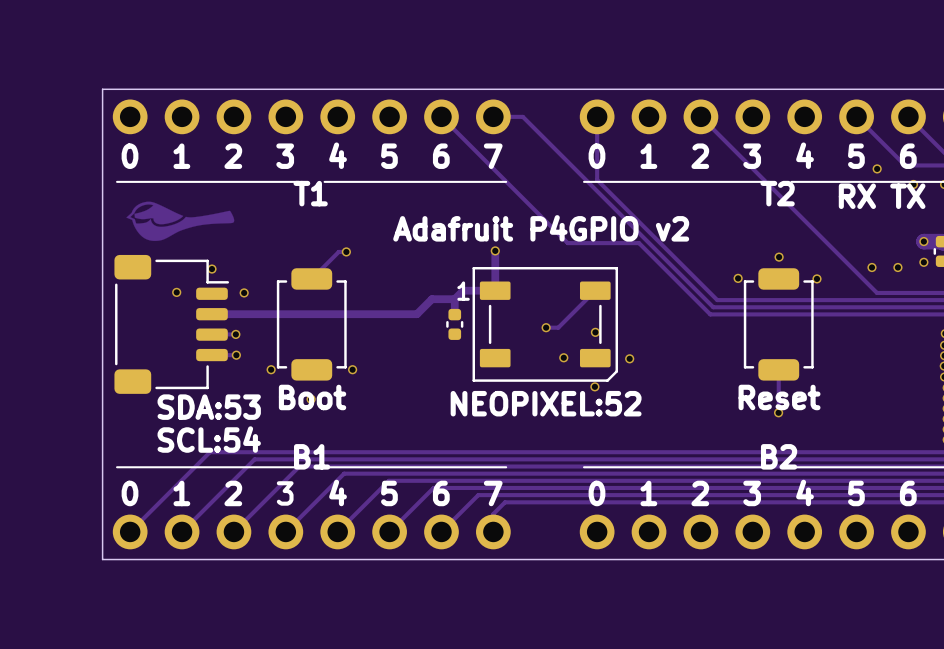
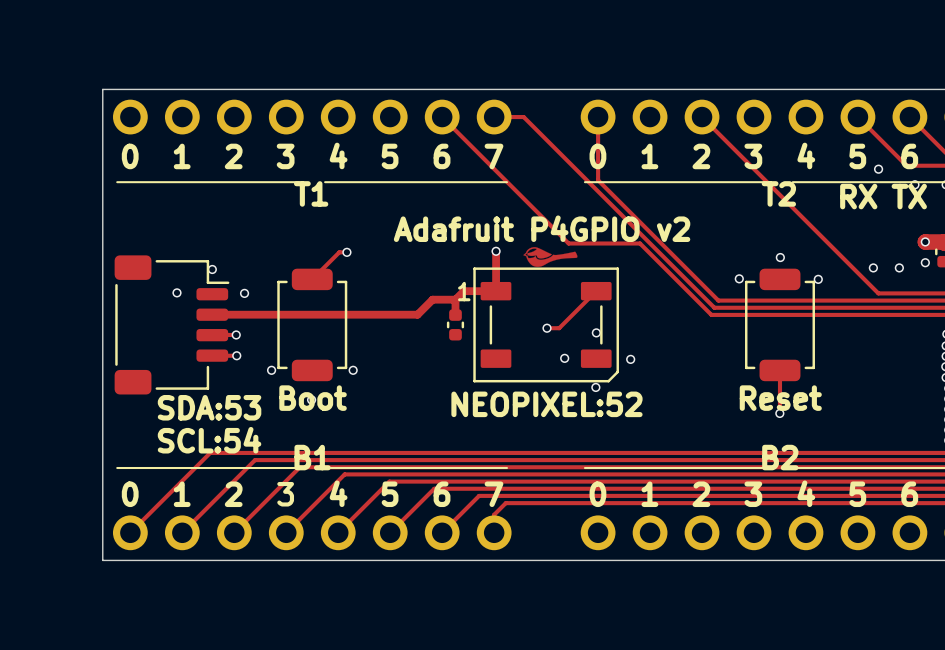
drawing: [126, 201, 235, 241] -> none
drawing: none -> [523, 247, 578, 267]

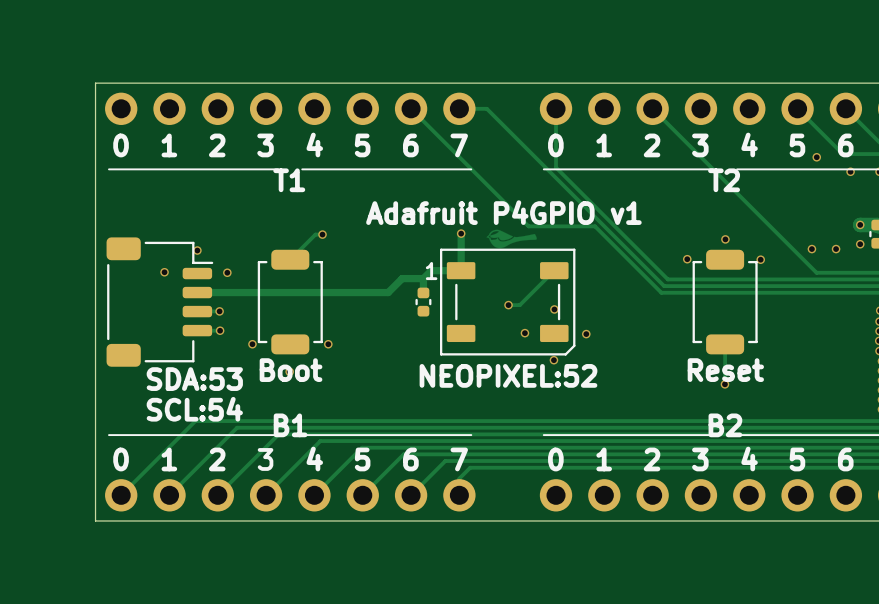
text: RX (858, 196) -> none
text: TX (909, 196) -> none
text: Adafruit P4GPIO v2 (542, 228) -> Adafruit P4GPIO v1 (503, 212)

